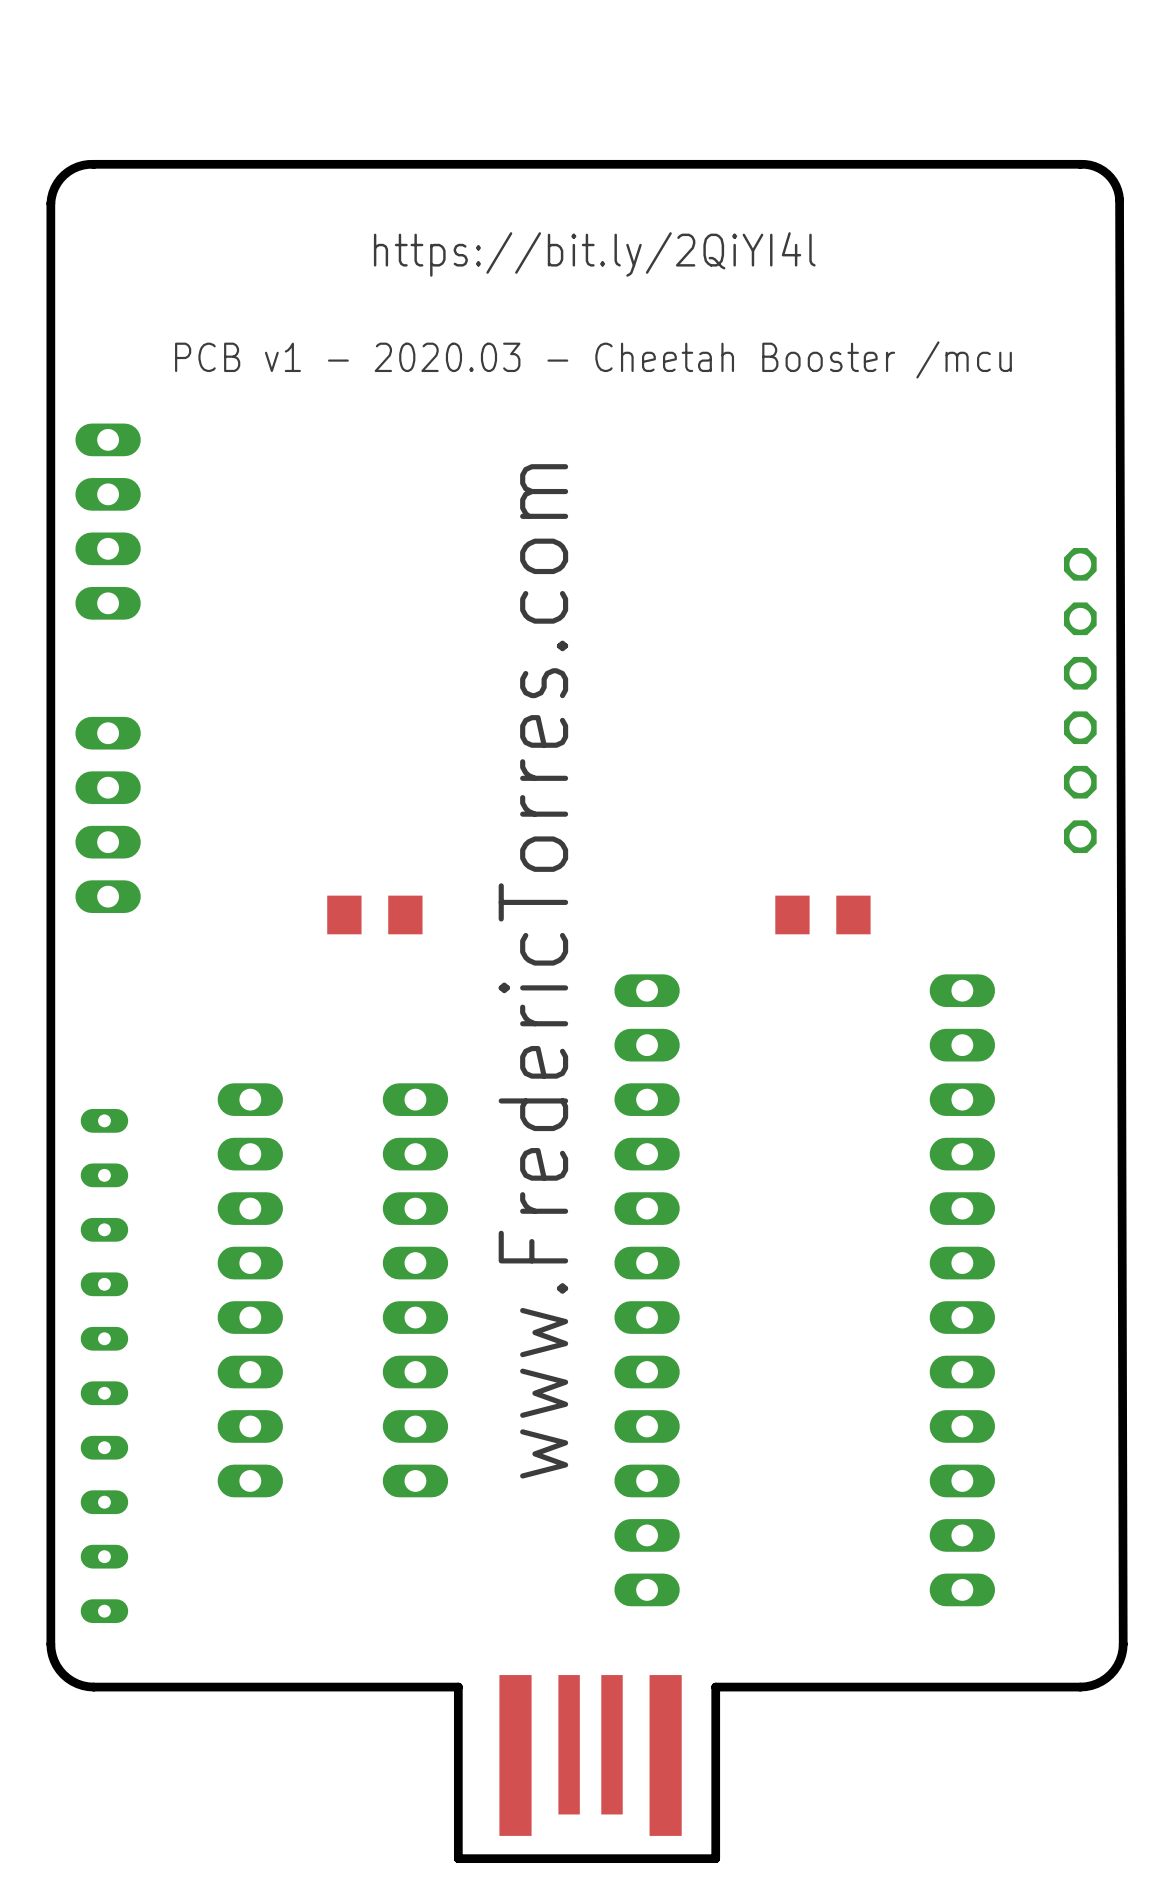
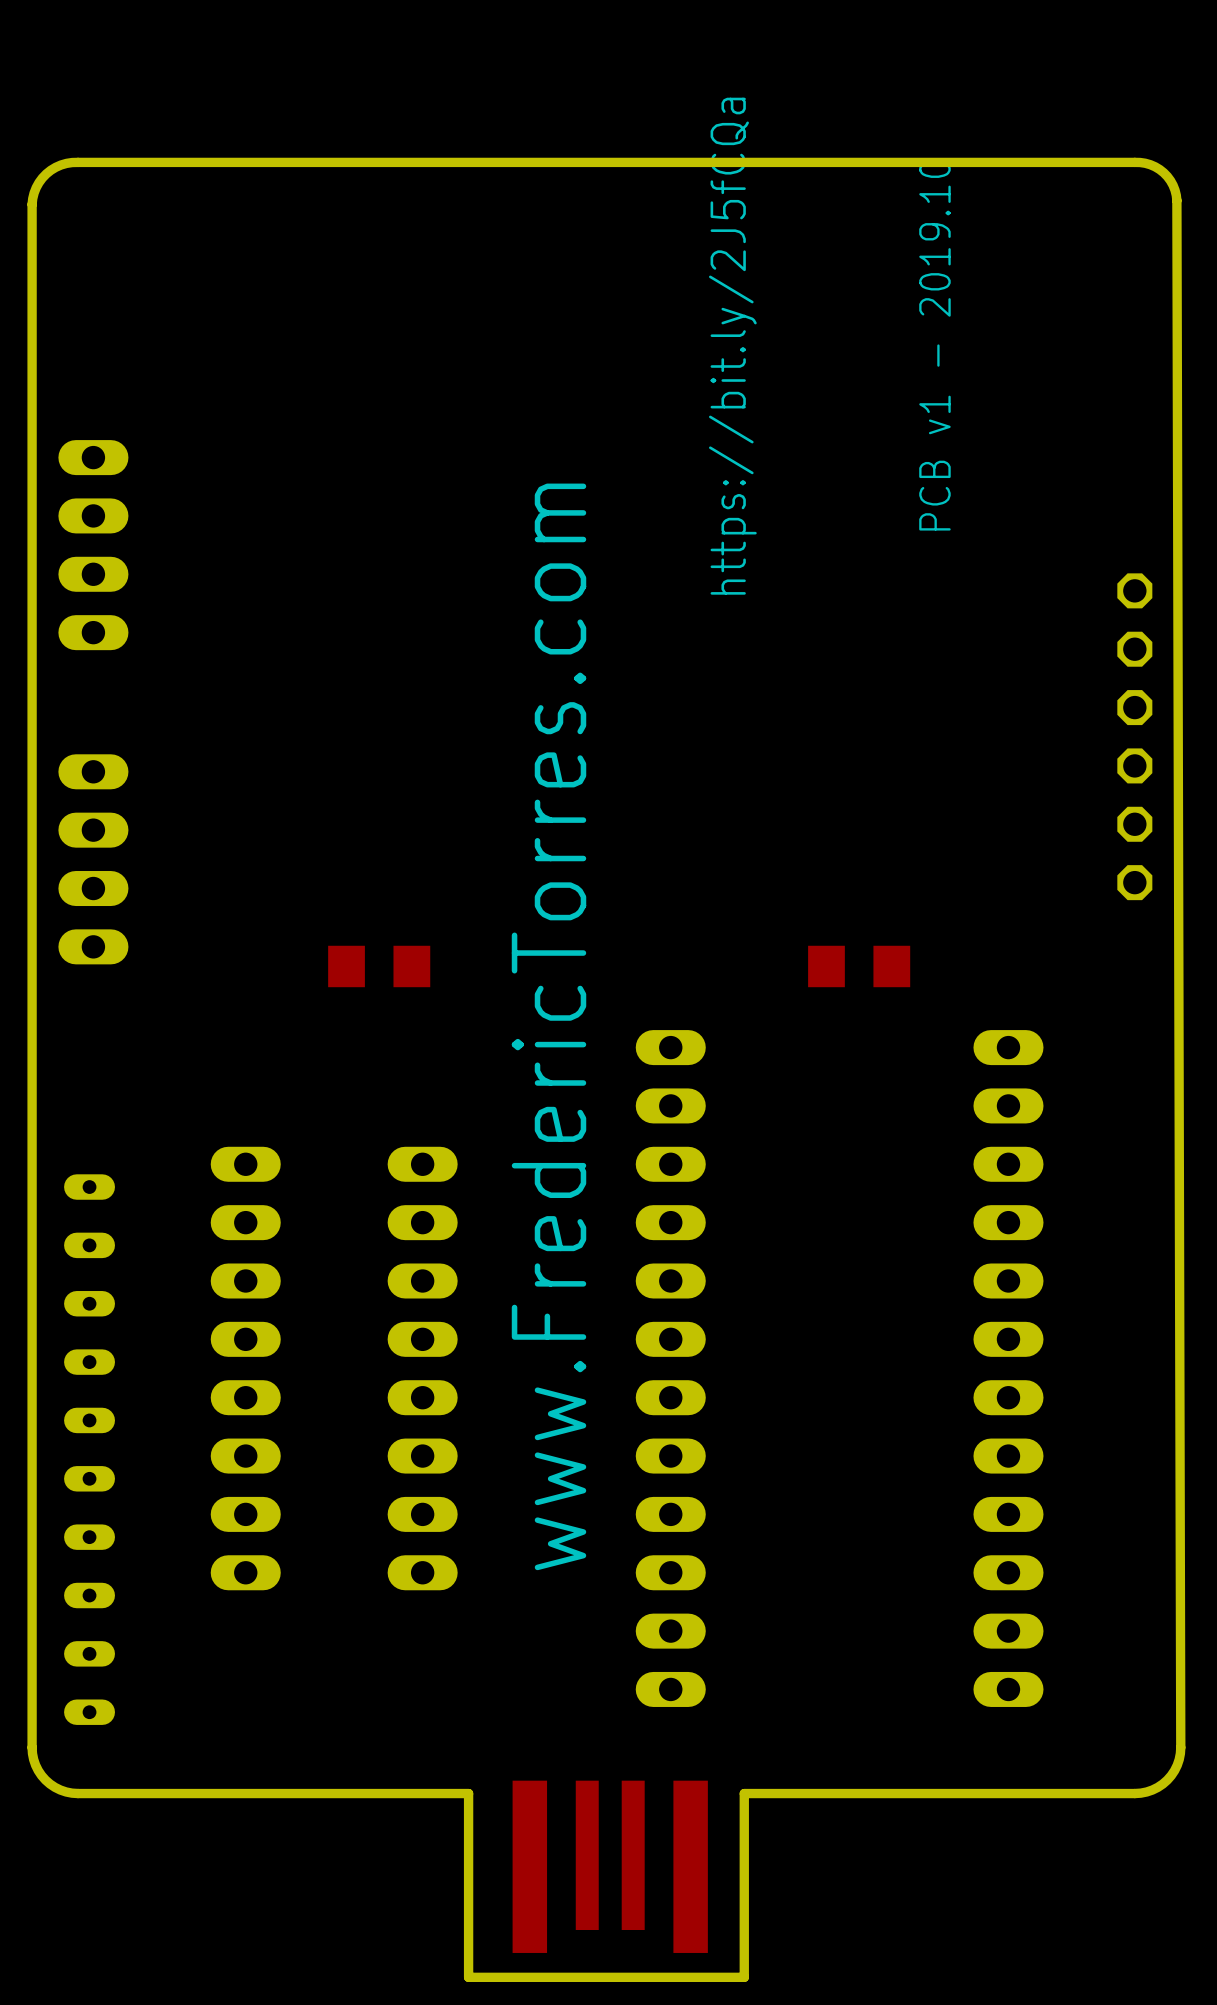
text: https://bit.ly/2QiYI4l (594, 254) -> https://bit.ly/2J5fCQa (732, 346)
text: none -> PCB v1 - 2019.10 (934, 345)
text: PCB v1 - 2020.03 - Cheetah Booster /mcu (593, 359) -> none

